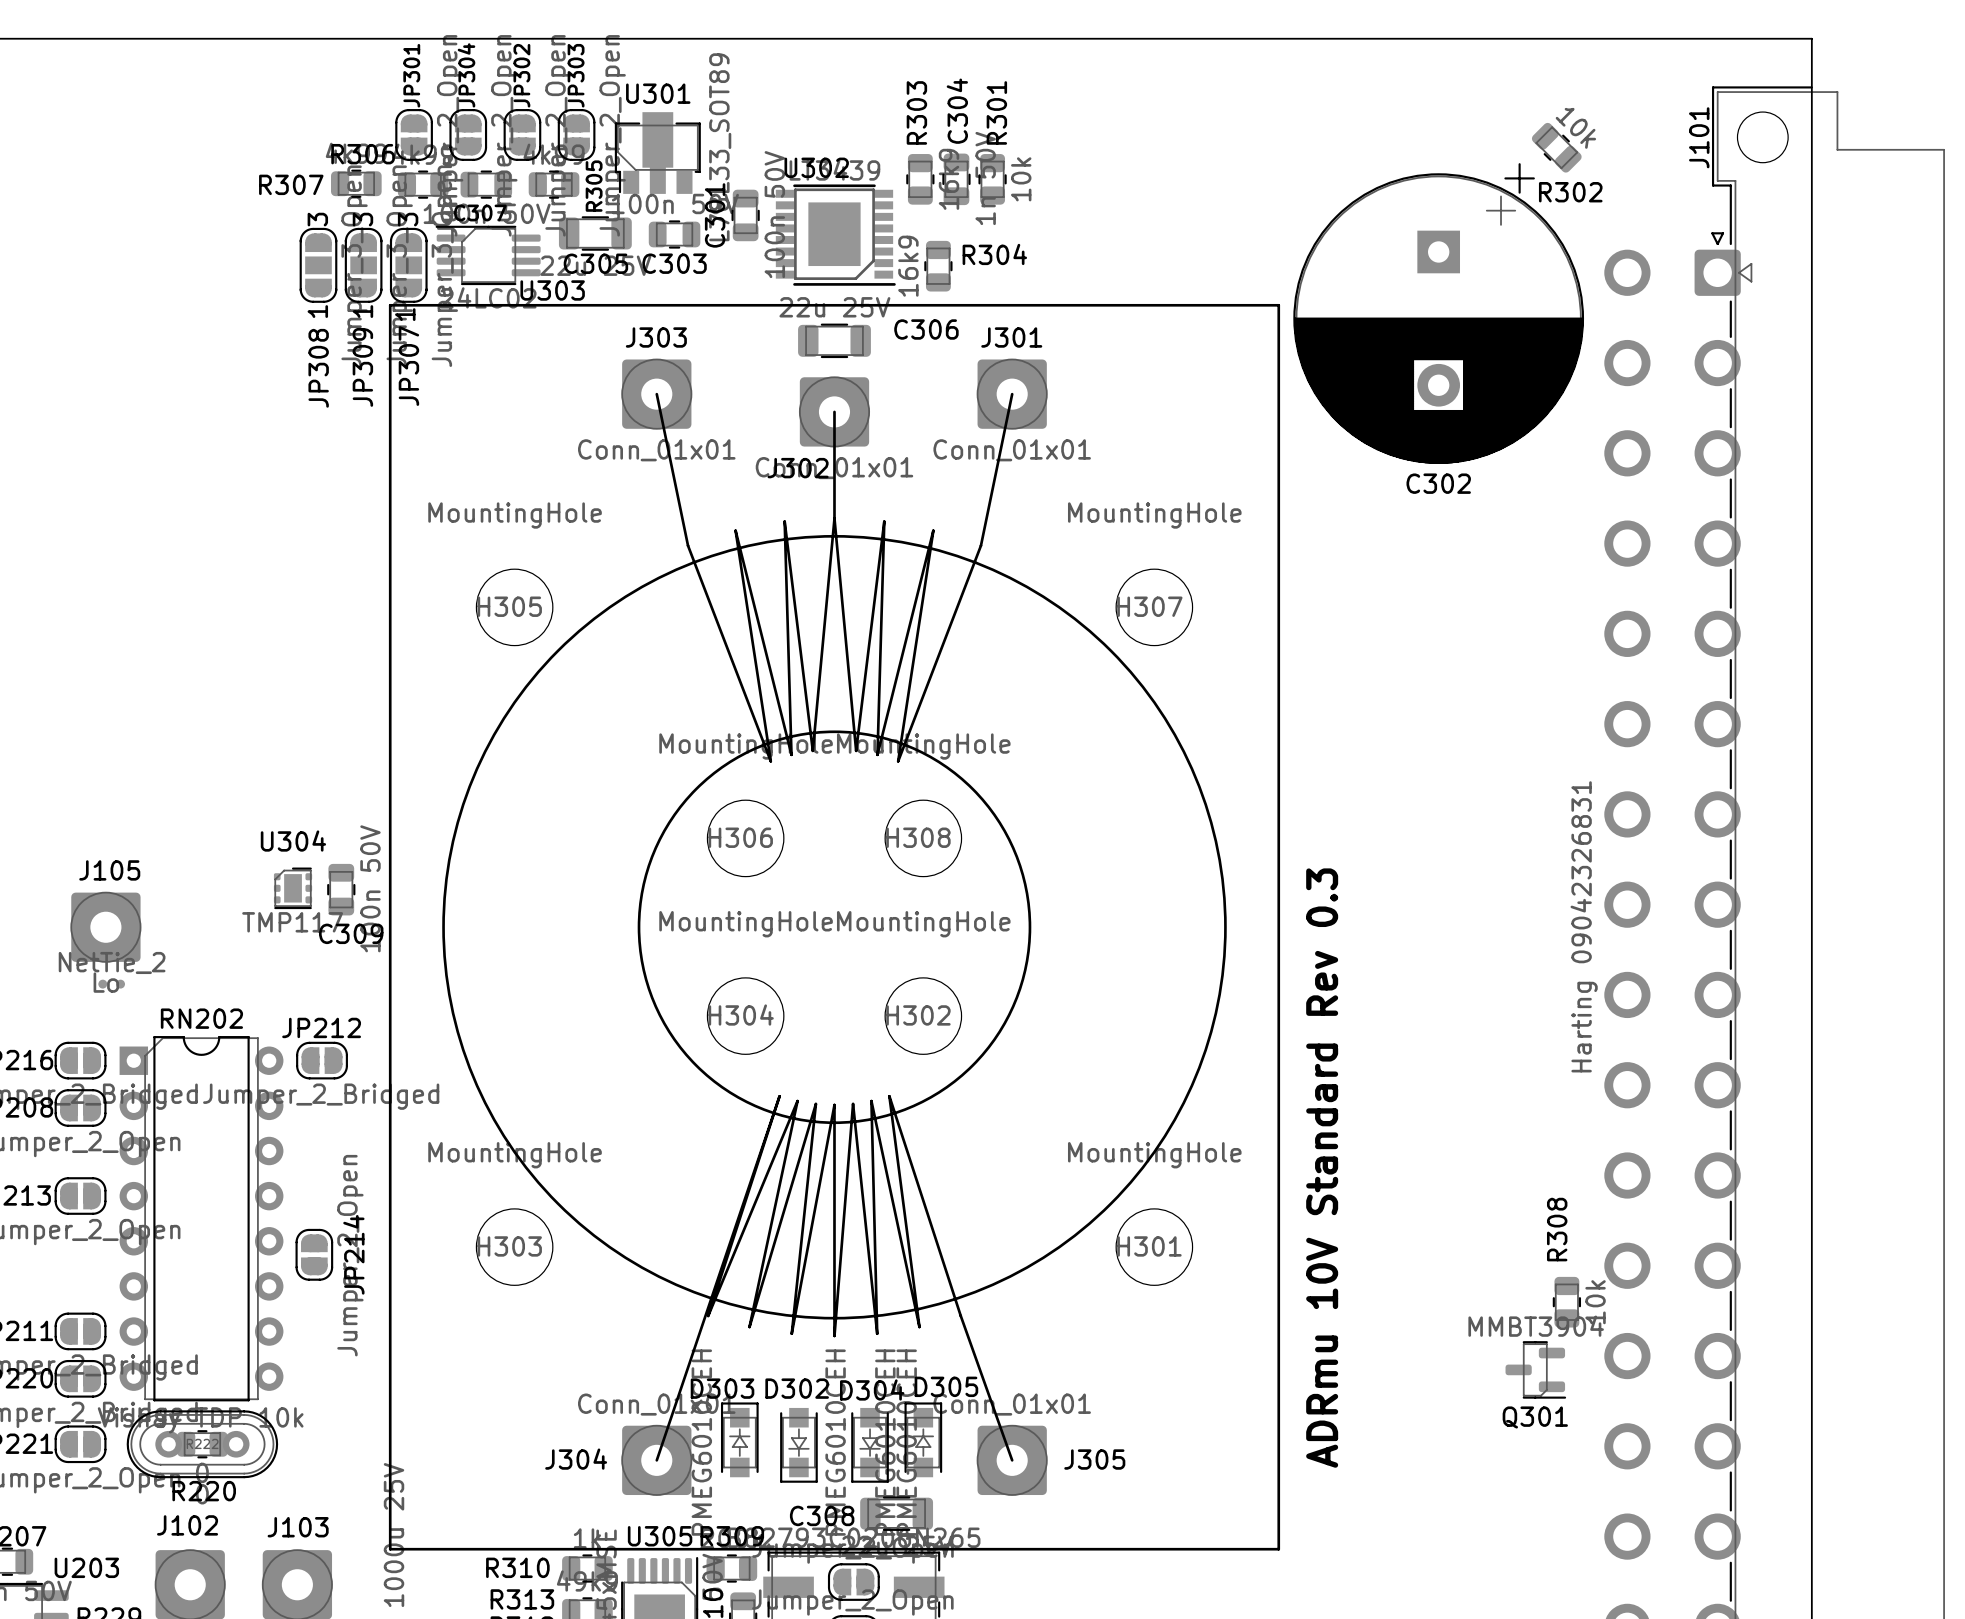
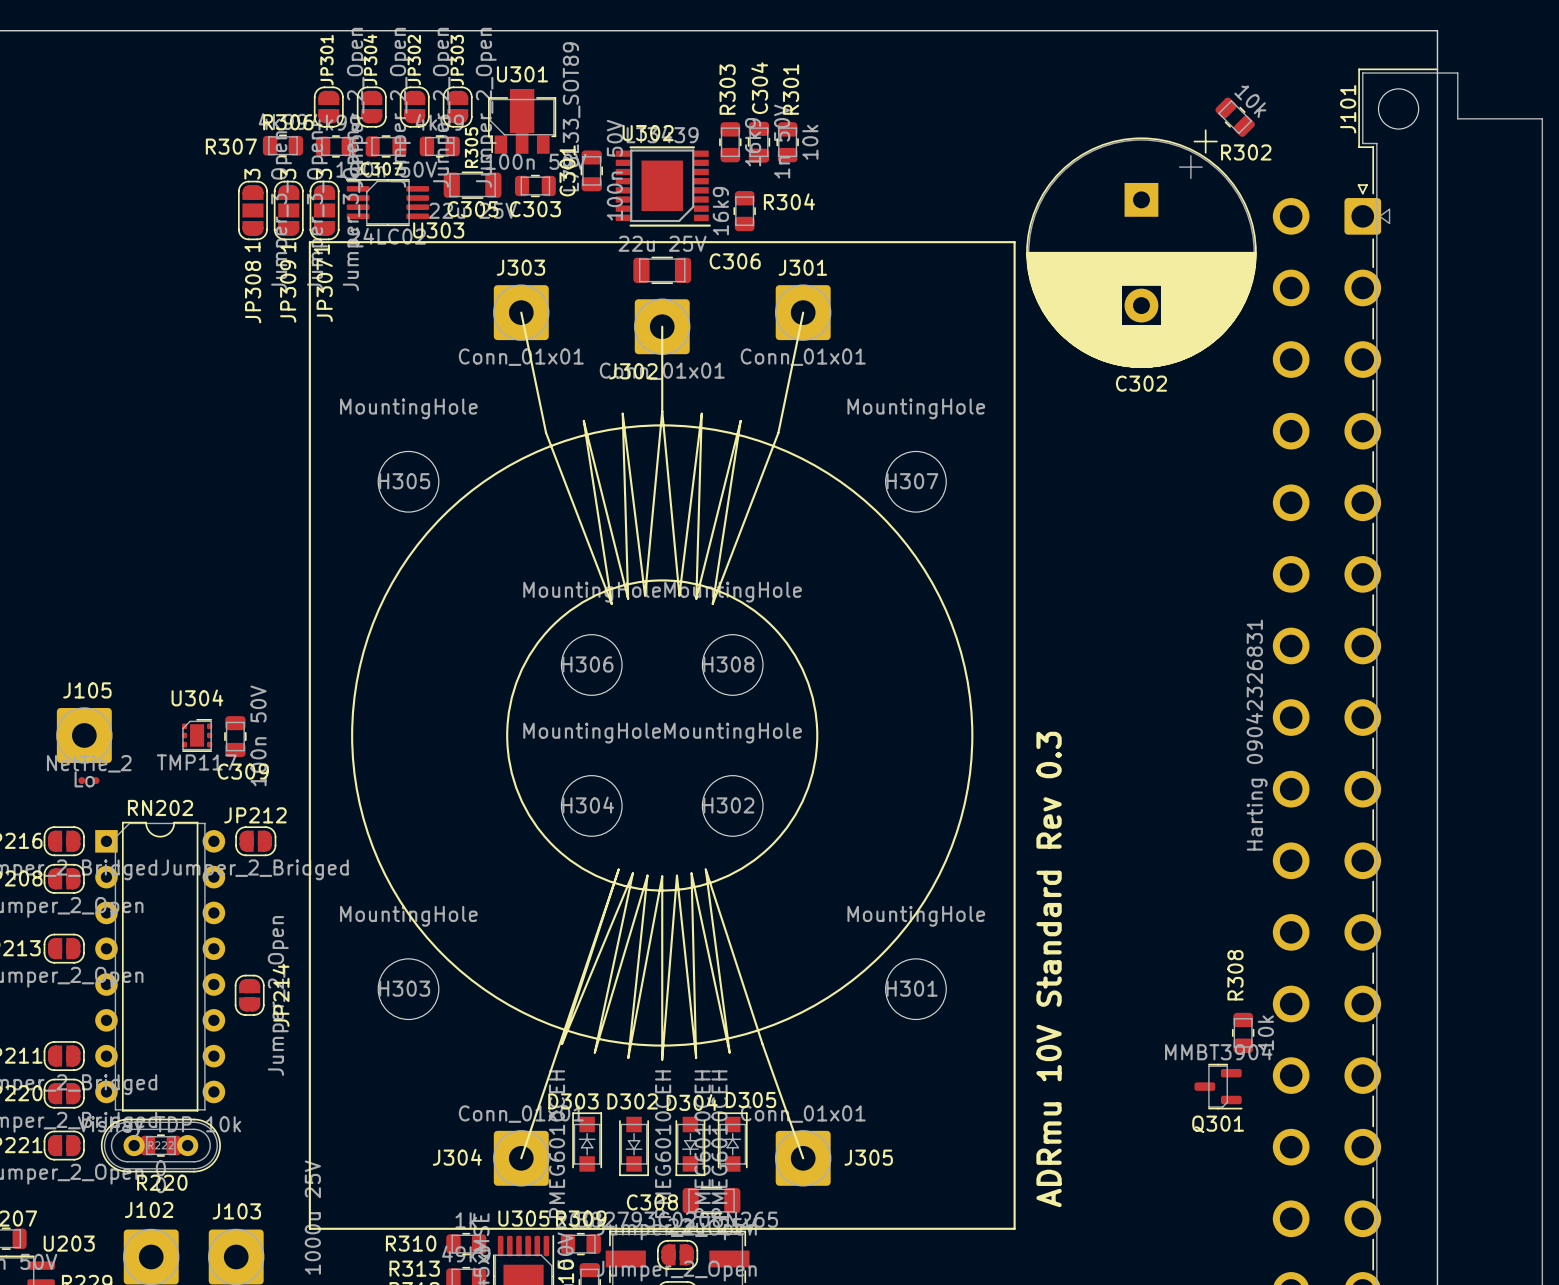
U304 position: (293, 888) -> (197, 735)
C309 position: (341, 889) -> (235, 736)
text position: ADRmu 10V Standard Rev 0.3 (1322, 1168) -> ADRmu 10V Standard Rev 0.3 (1049, 969)

